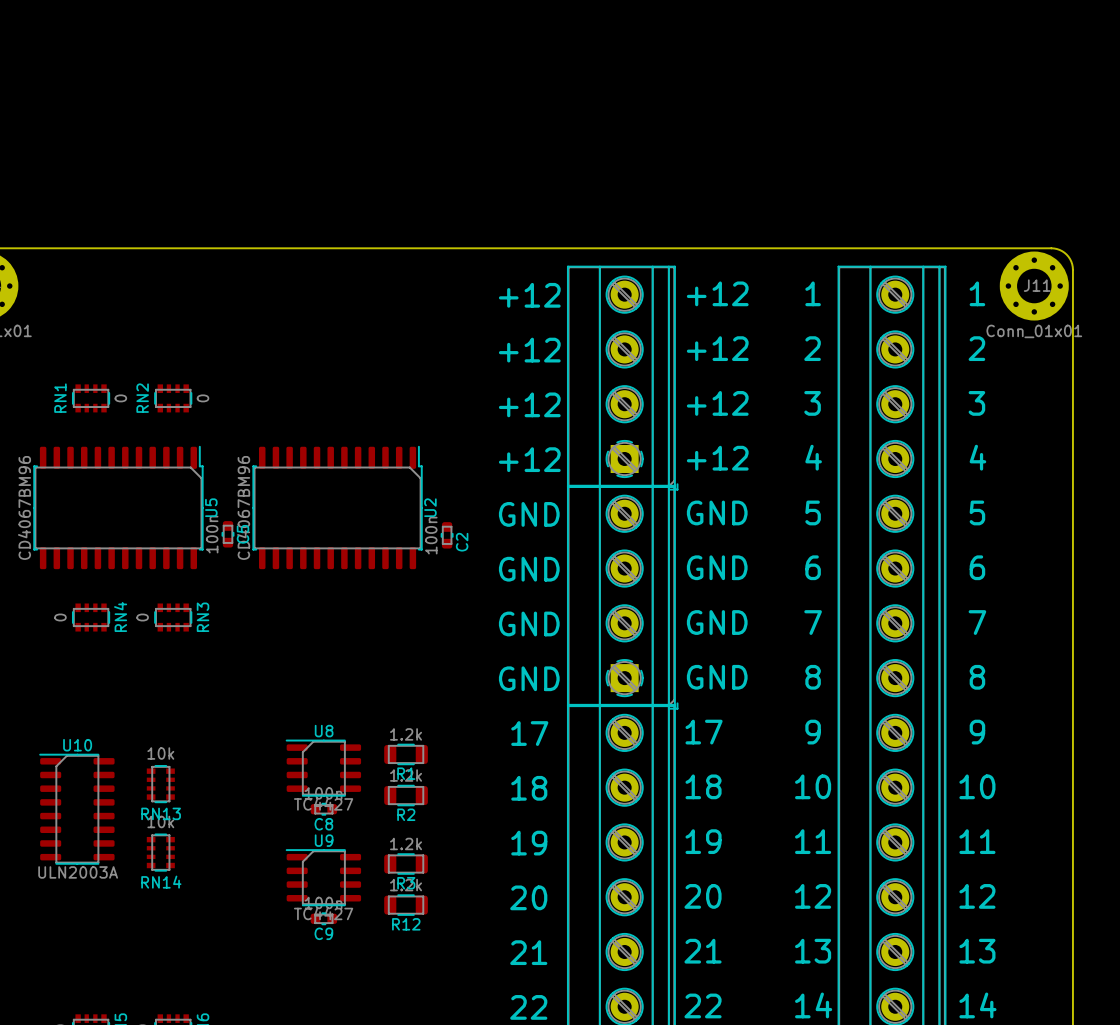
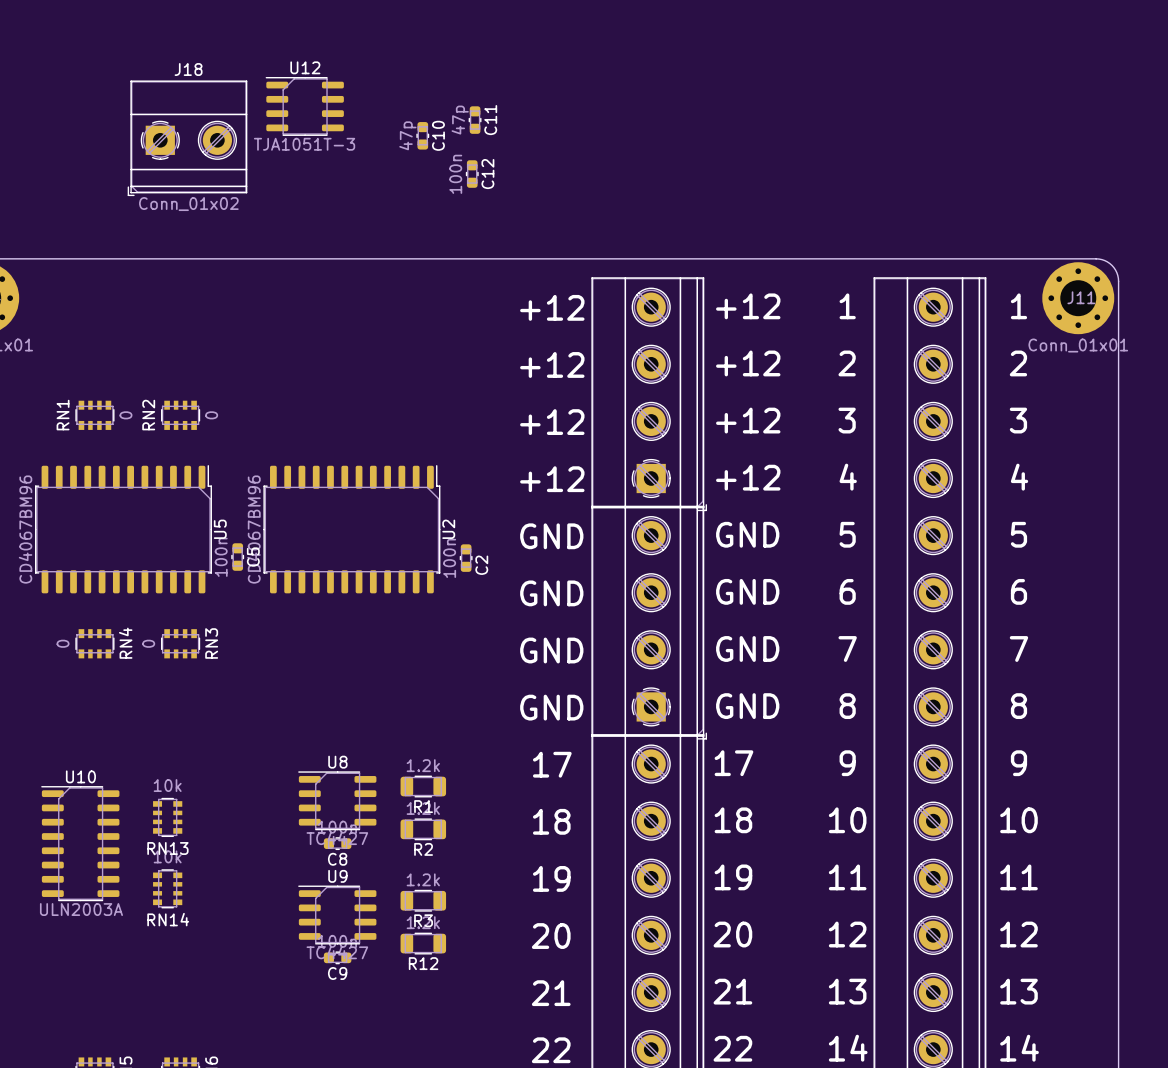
U12: none -> TJA1051T-3 (304, 106)
C11: none -> 47p (475, 120)
C10: none -> 47p (422, 135)
J18: none -> Conn_01x02 (187, 138)
C12: none -> 100n (472, 174)

